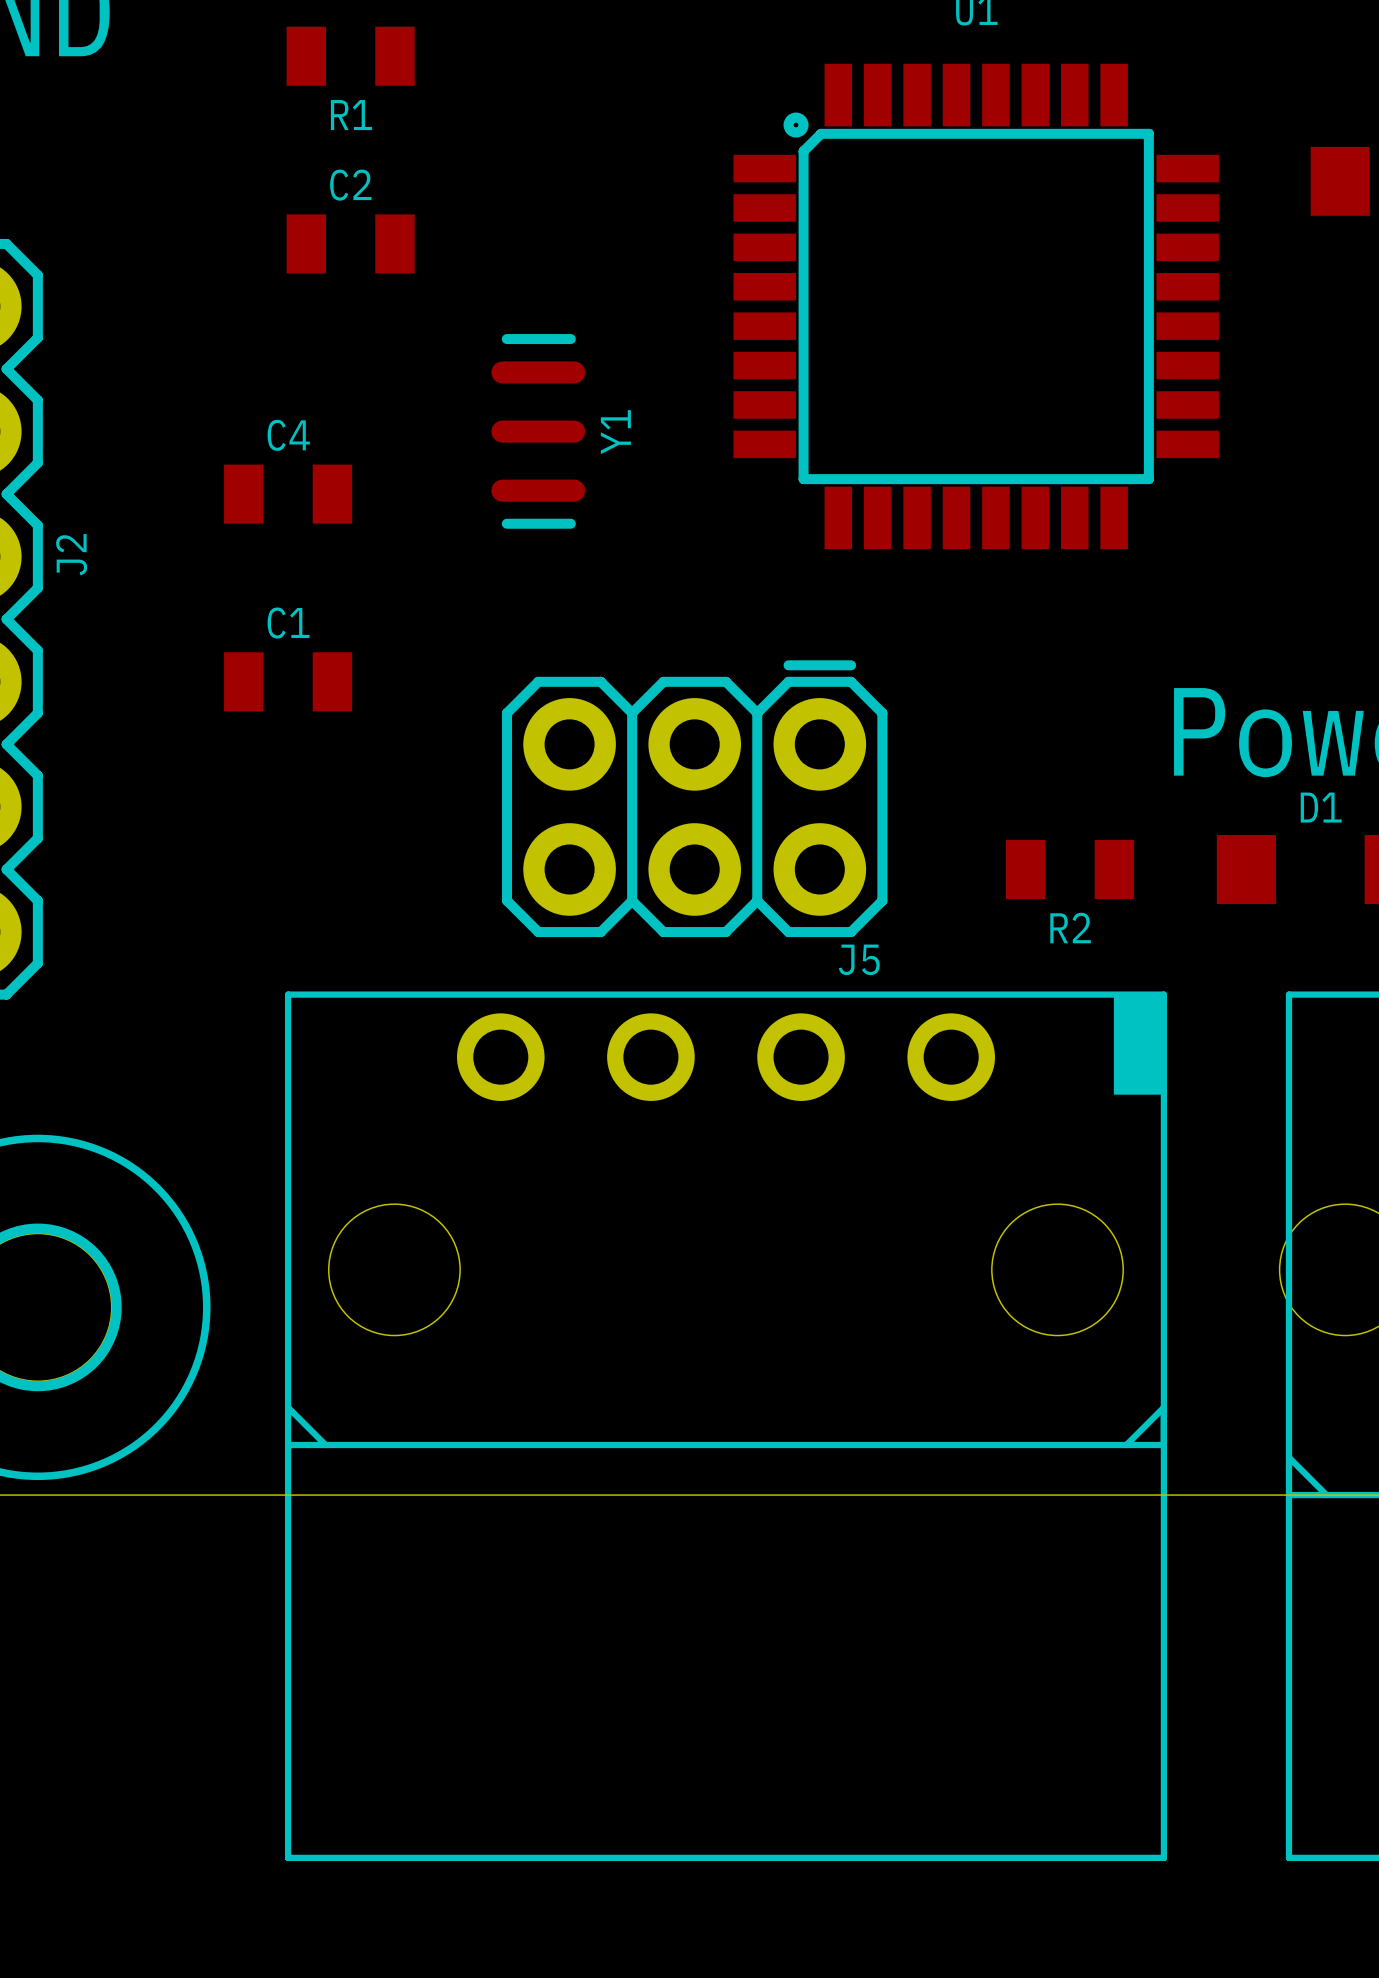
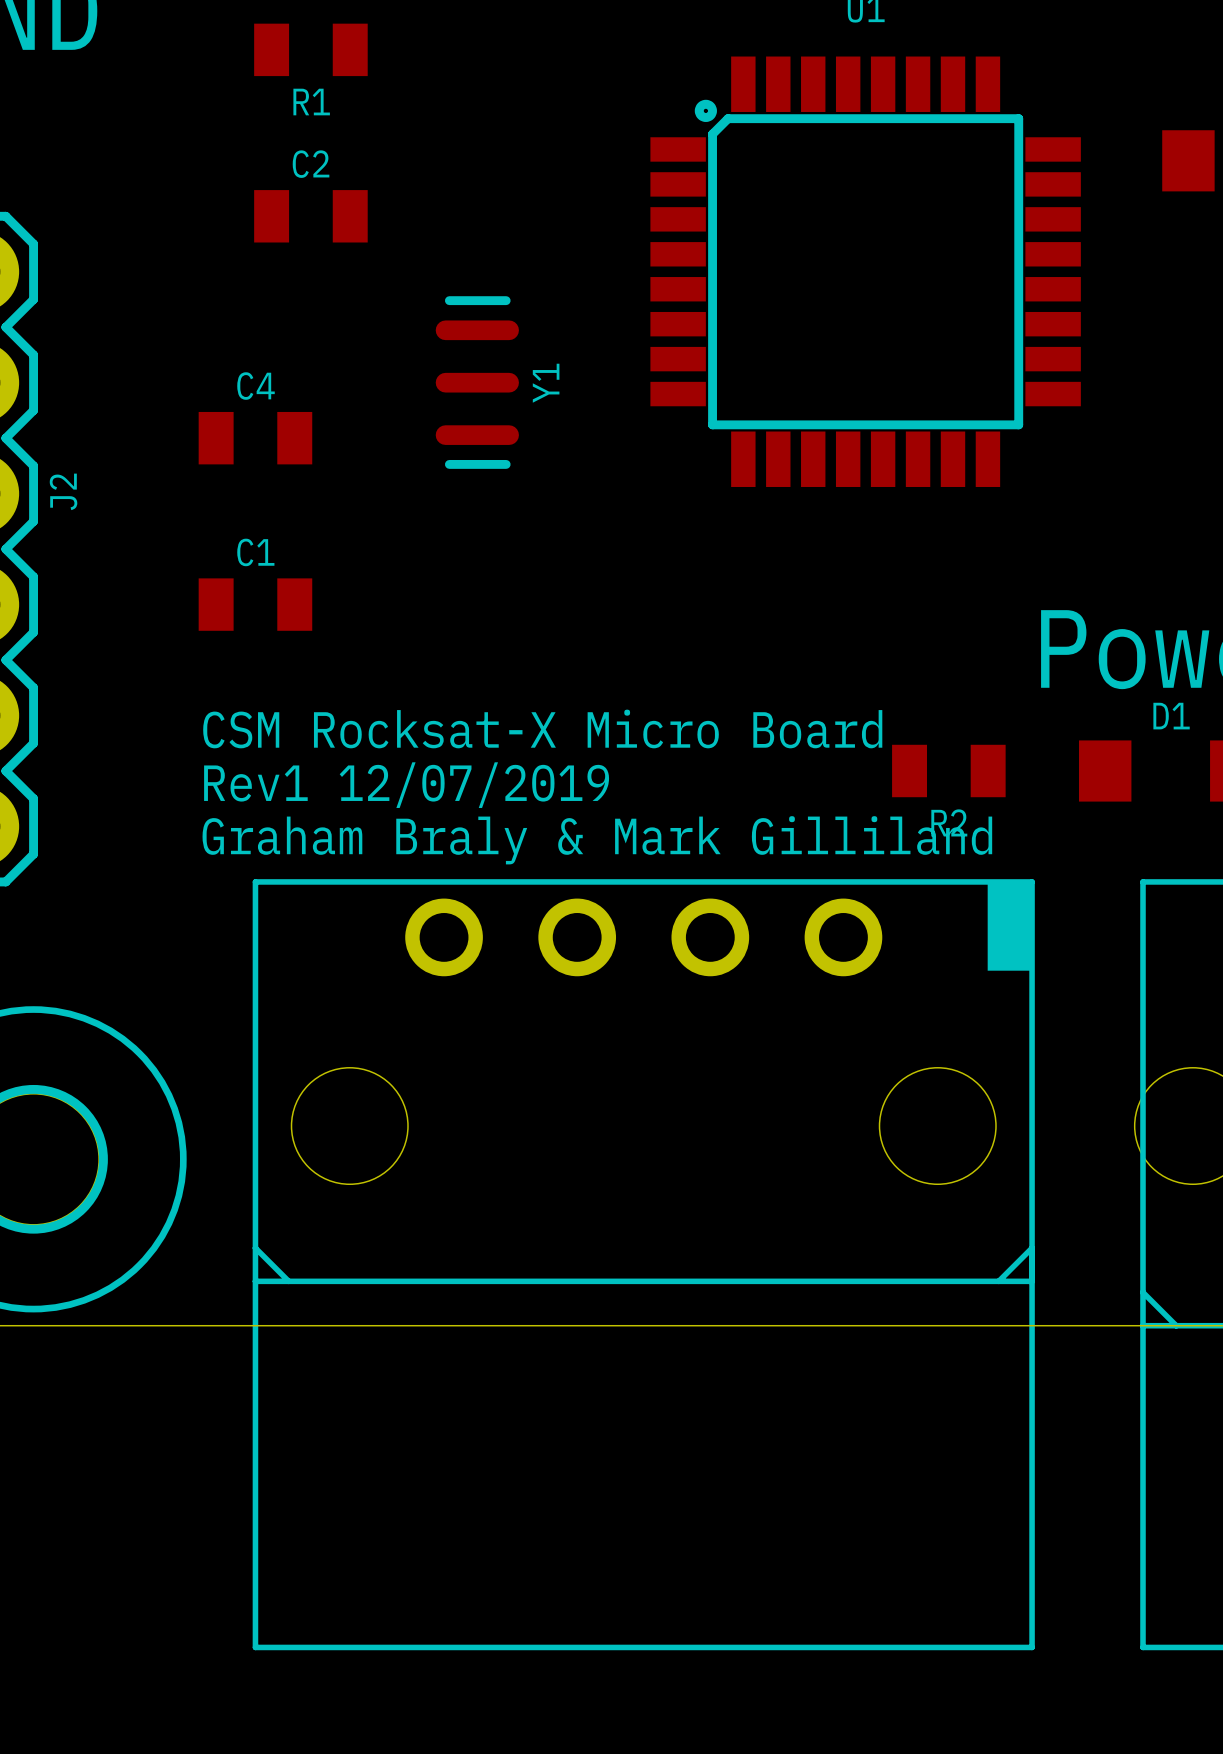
J5: (694, 798) -> none
text: none -> CSM Rocksat-X Micro Board (542, 728)
text: none -> Rev1 12/07/2019 (406, 785)
text: none -> Graham Braly & Mark Gilliland (597, 840)

